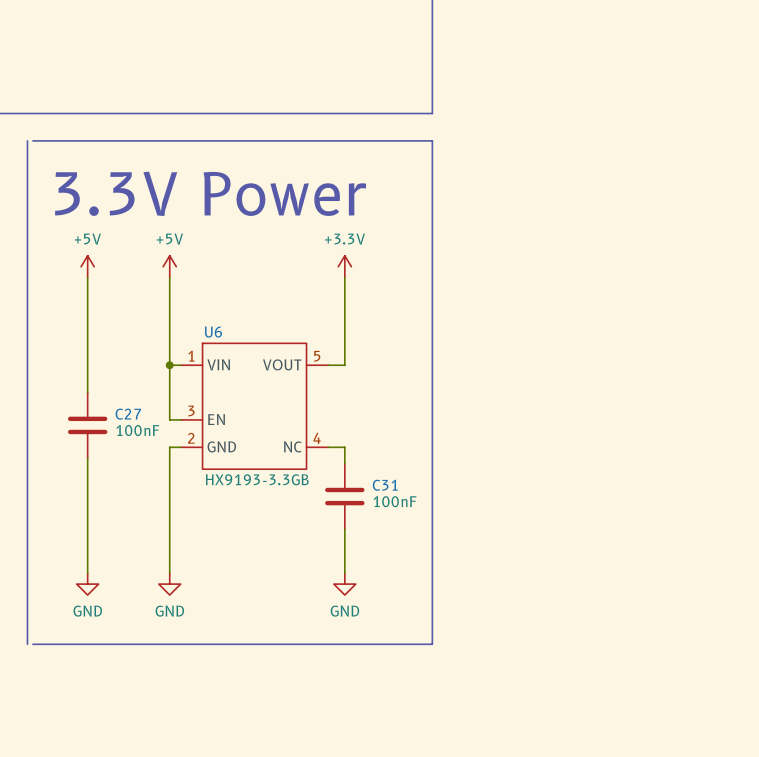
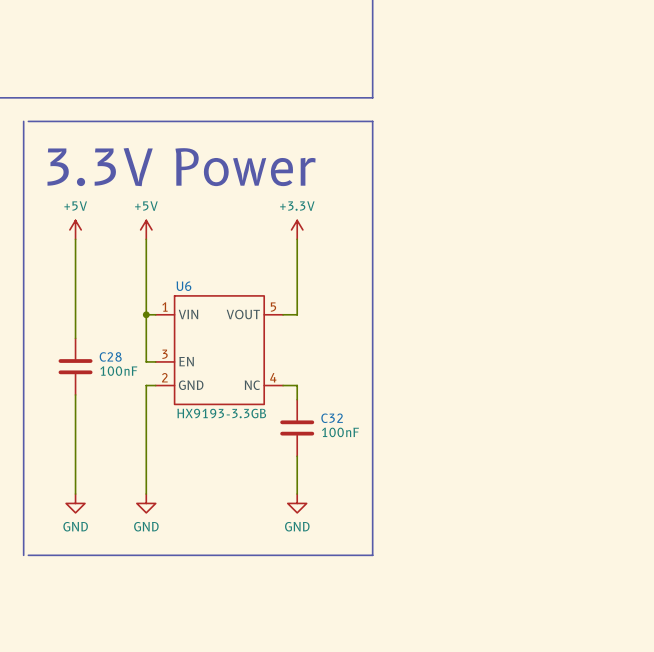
C27 name: C27 (128, 414) -> C28 (110, 356)
C31 name: C31 (385, 485) -> C32 (332, 418)

